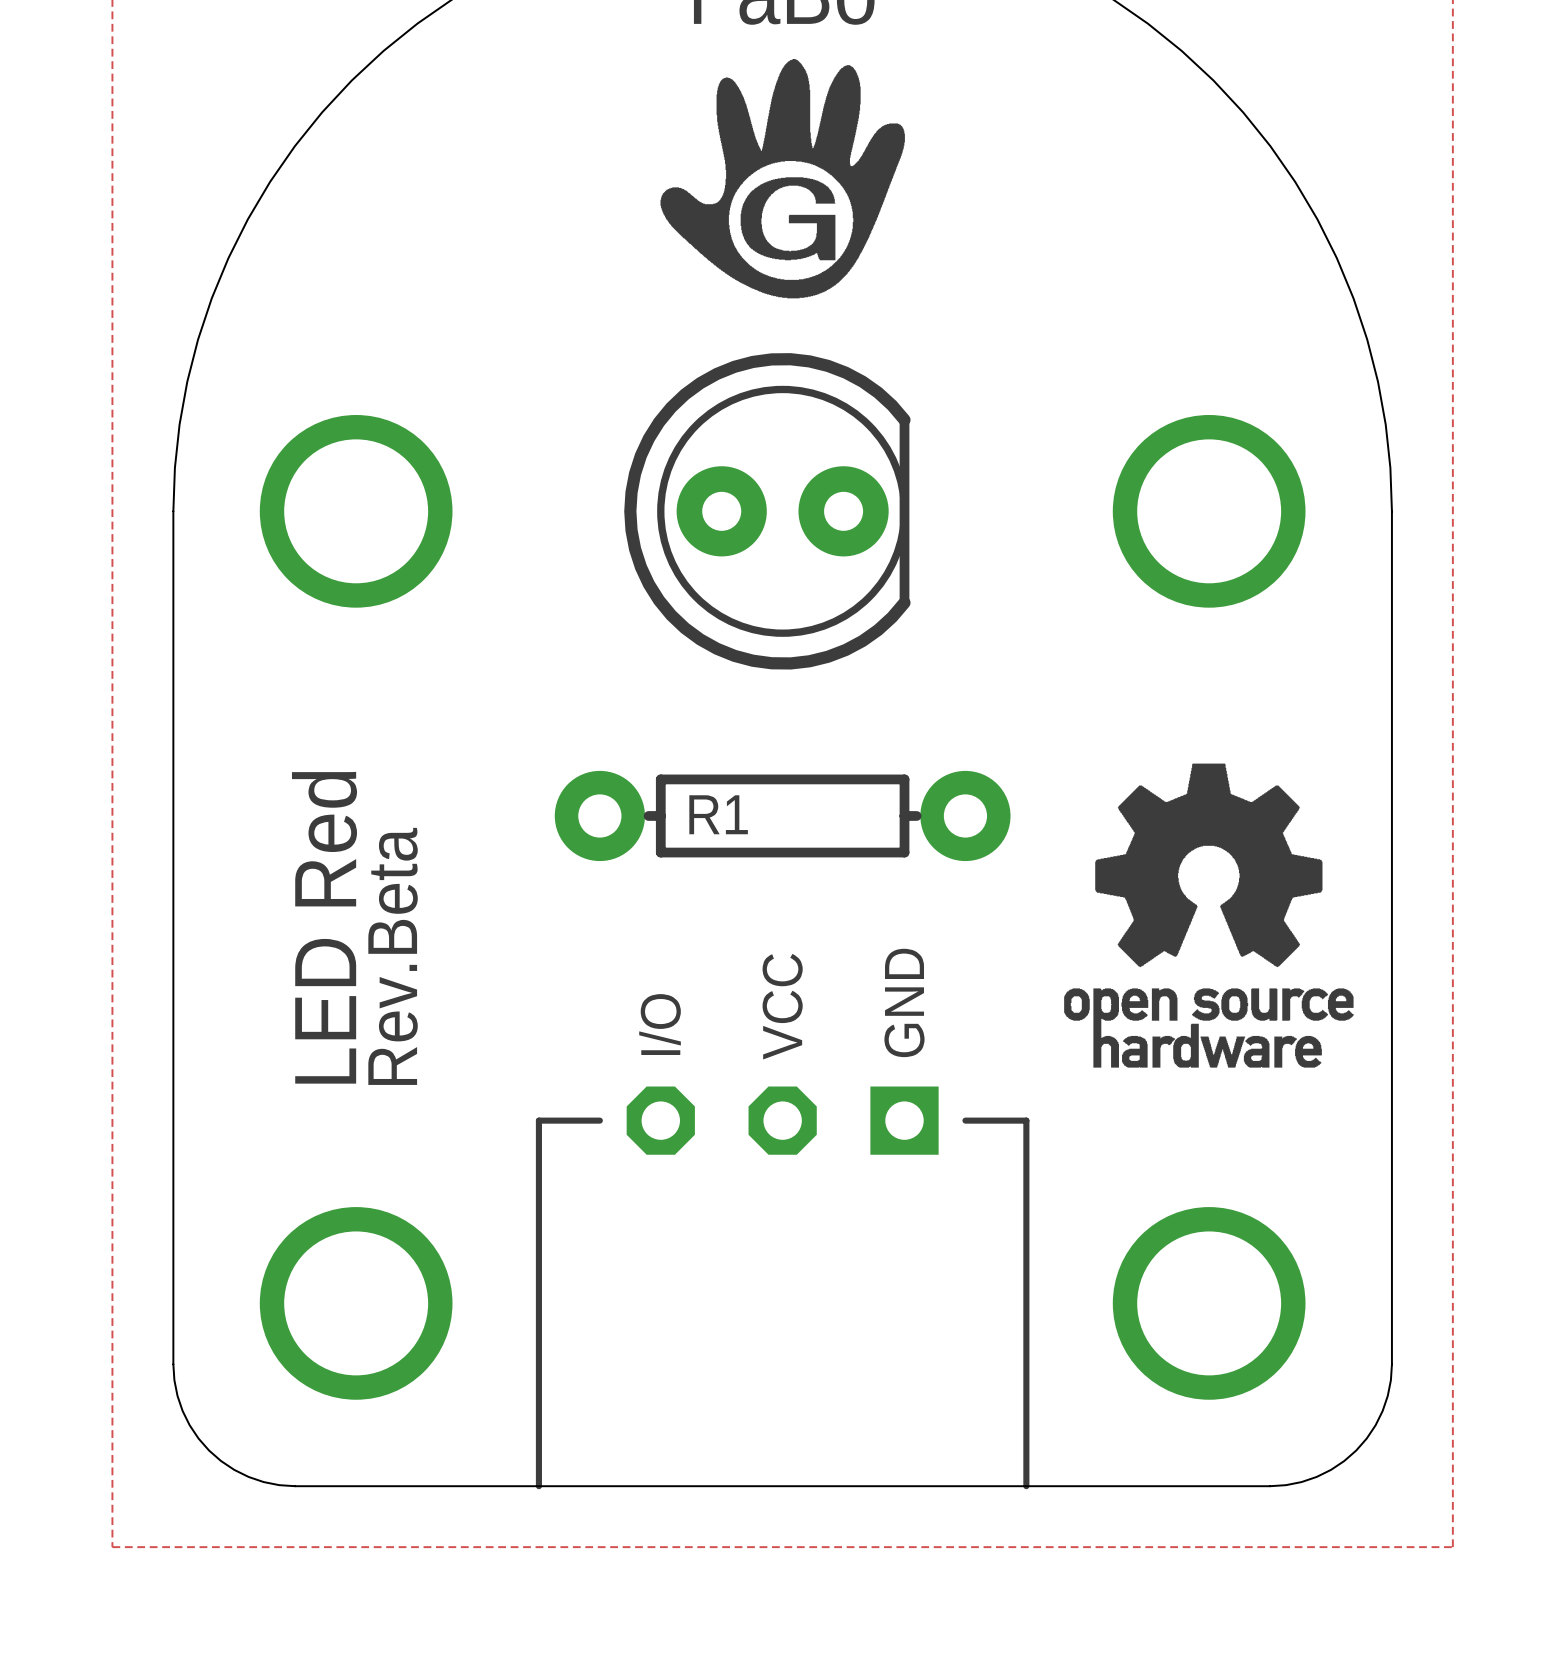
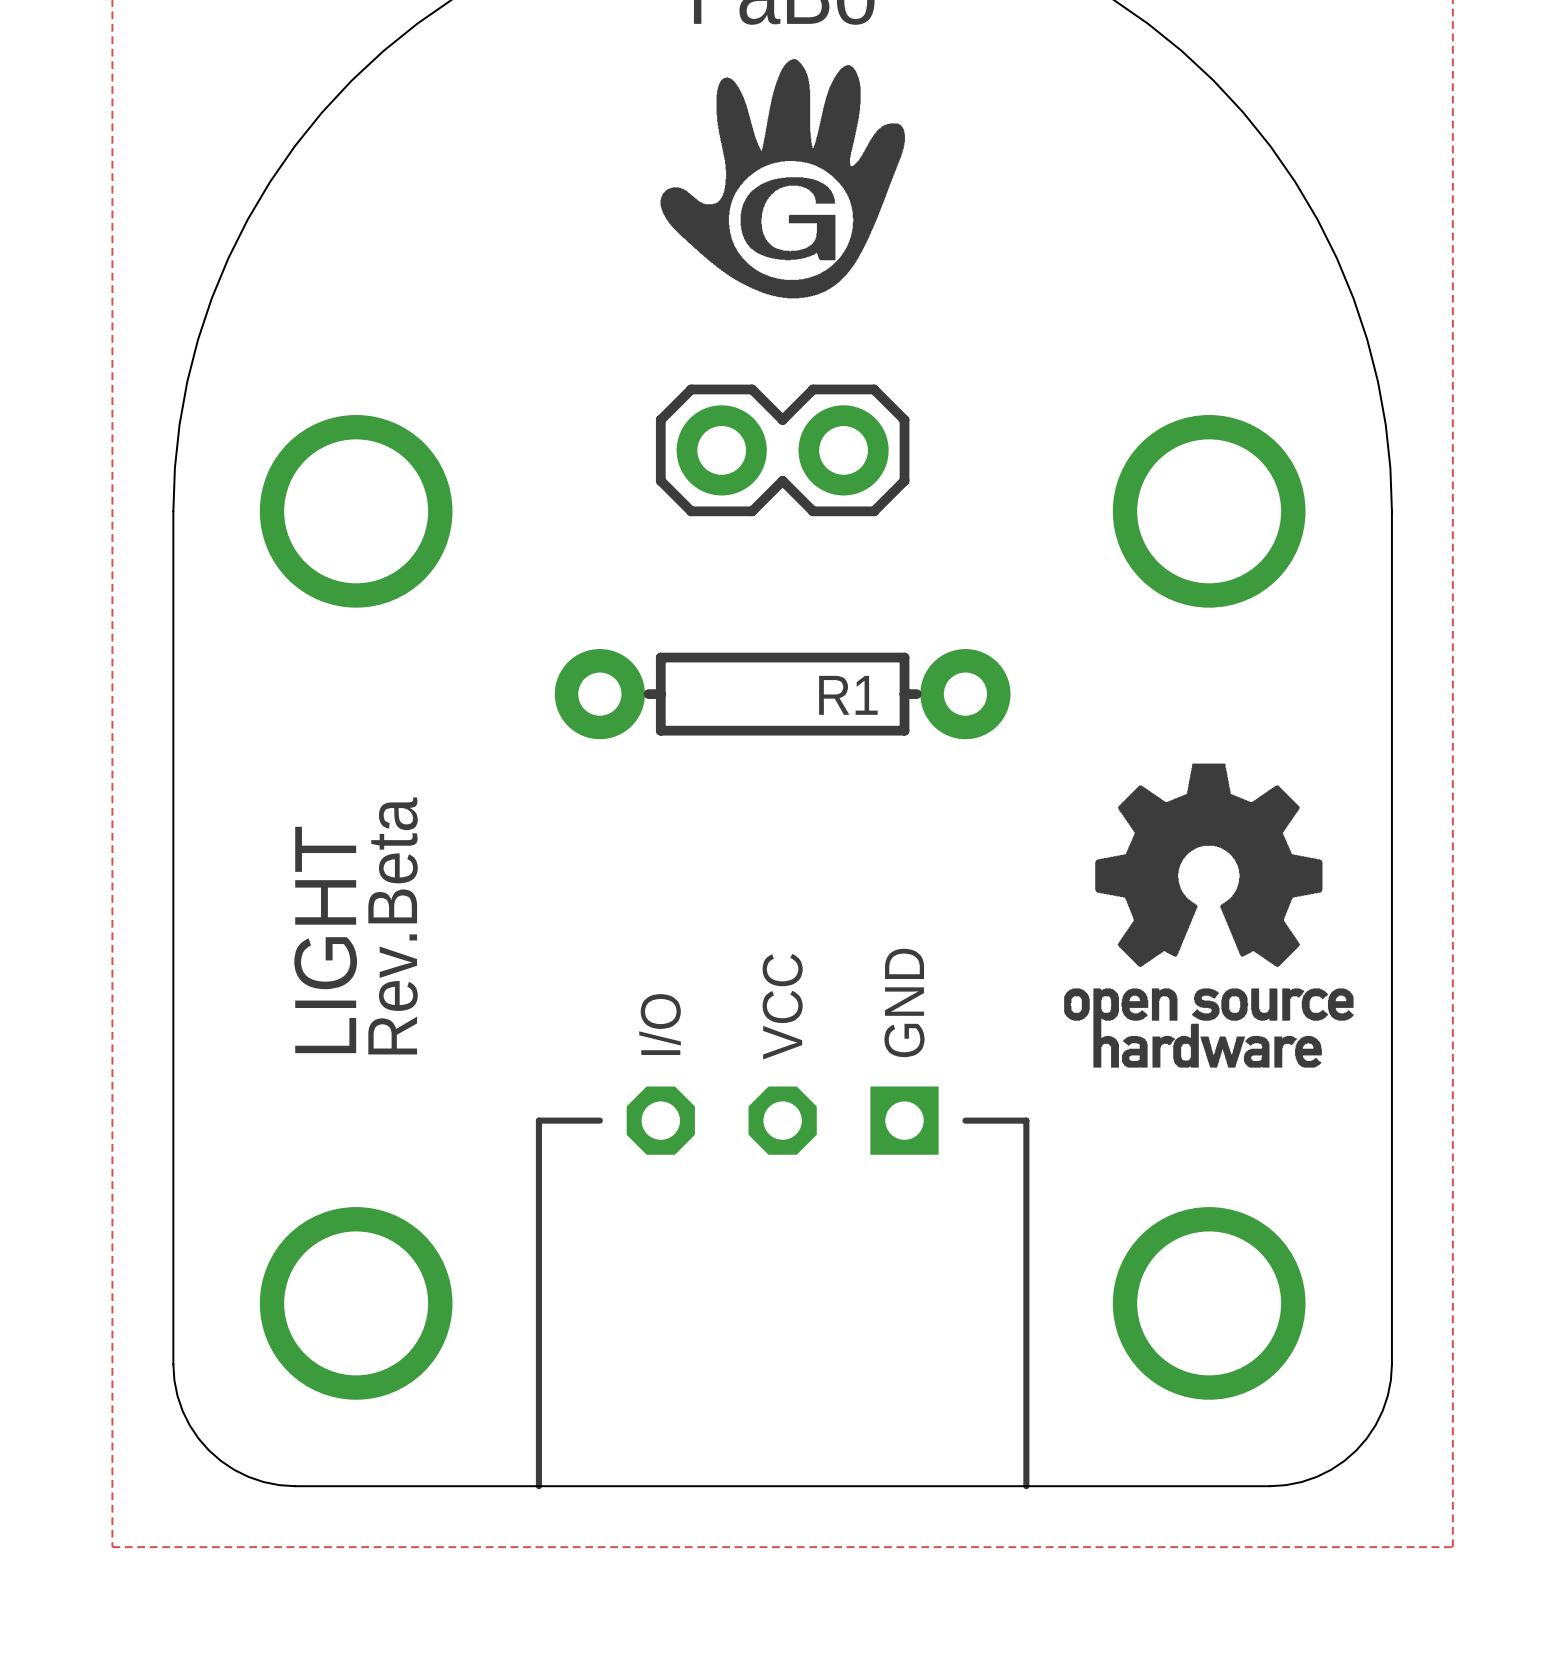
part: none -> (782, 450)
part: (767, 511) -> none
R1 name position: R1 (718, 814) -> R1 (848, 695)
R1 position: (782, 815) -> (782, 694)
text: LED Red (324, 927) -> LIGHT (325, 939)
text position: Rev.Beta (393, 956) -> Rev.Beta (393, 925)

